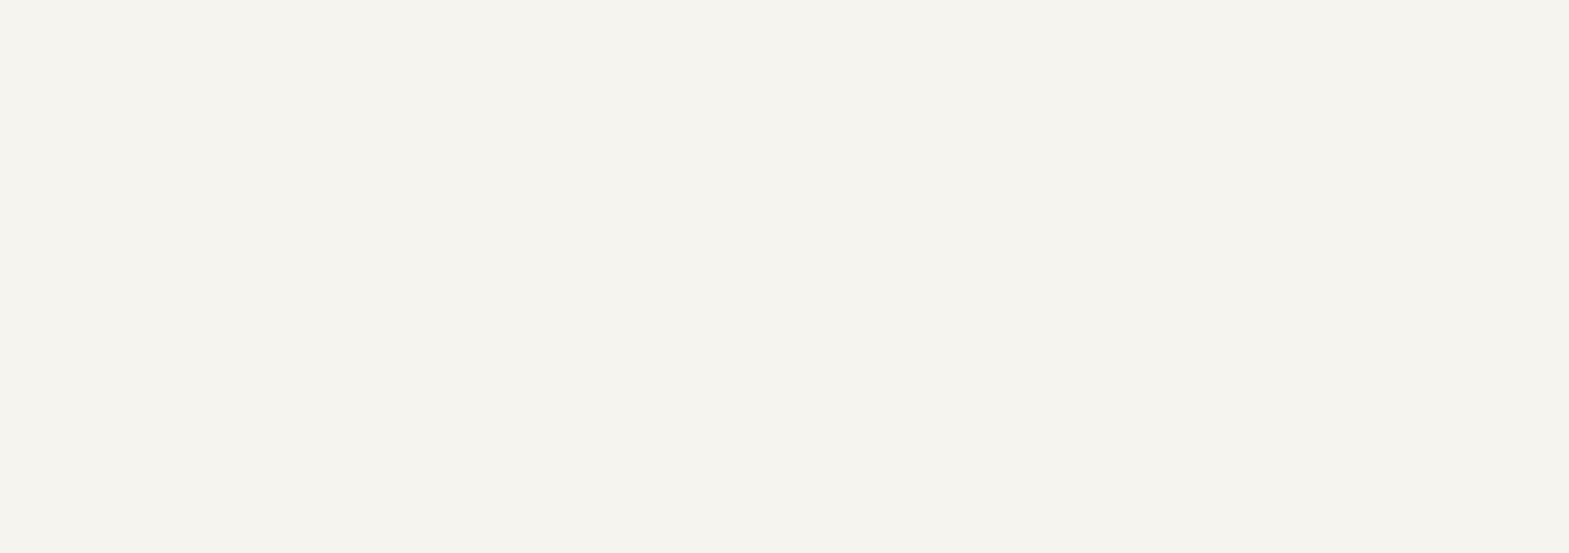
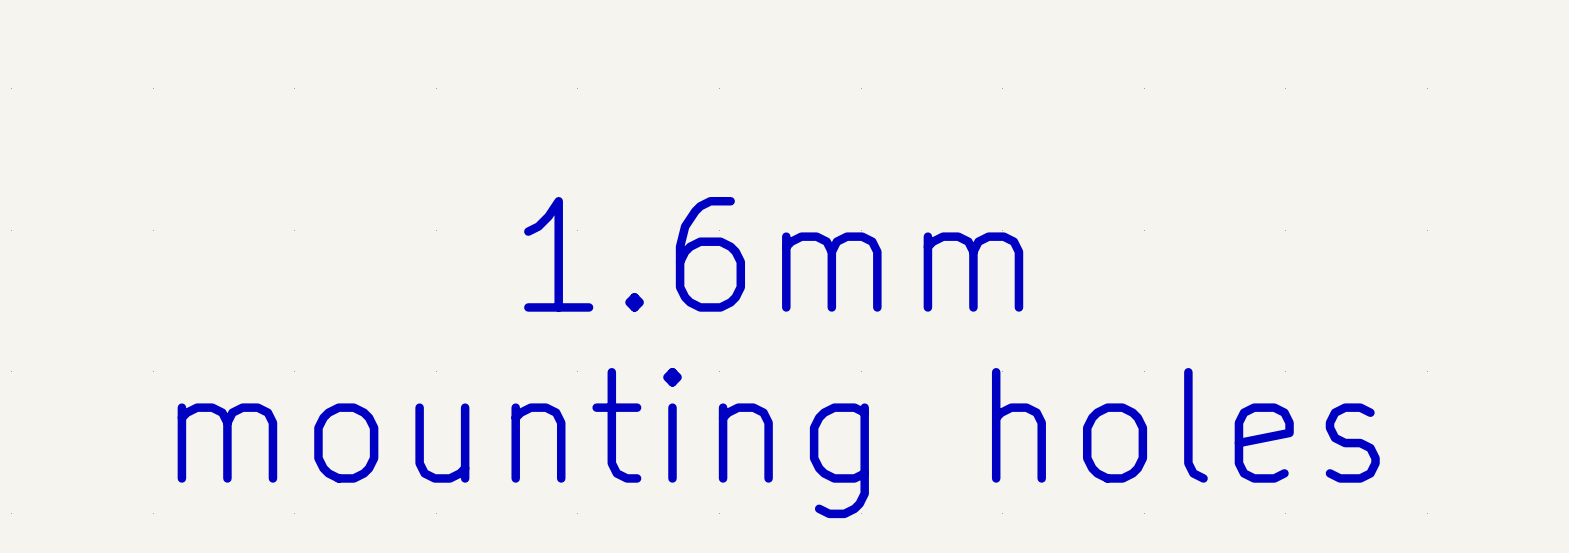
text: none -> 1.6mm (773, 254)
text: none -> mounting holes (778, 443)

